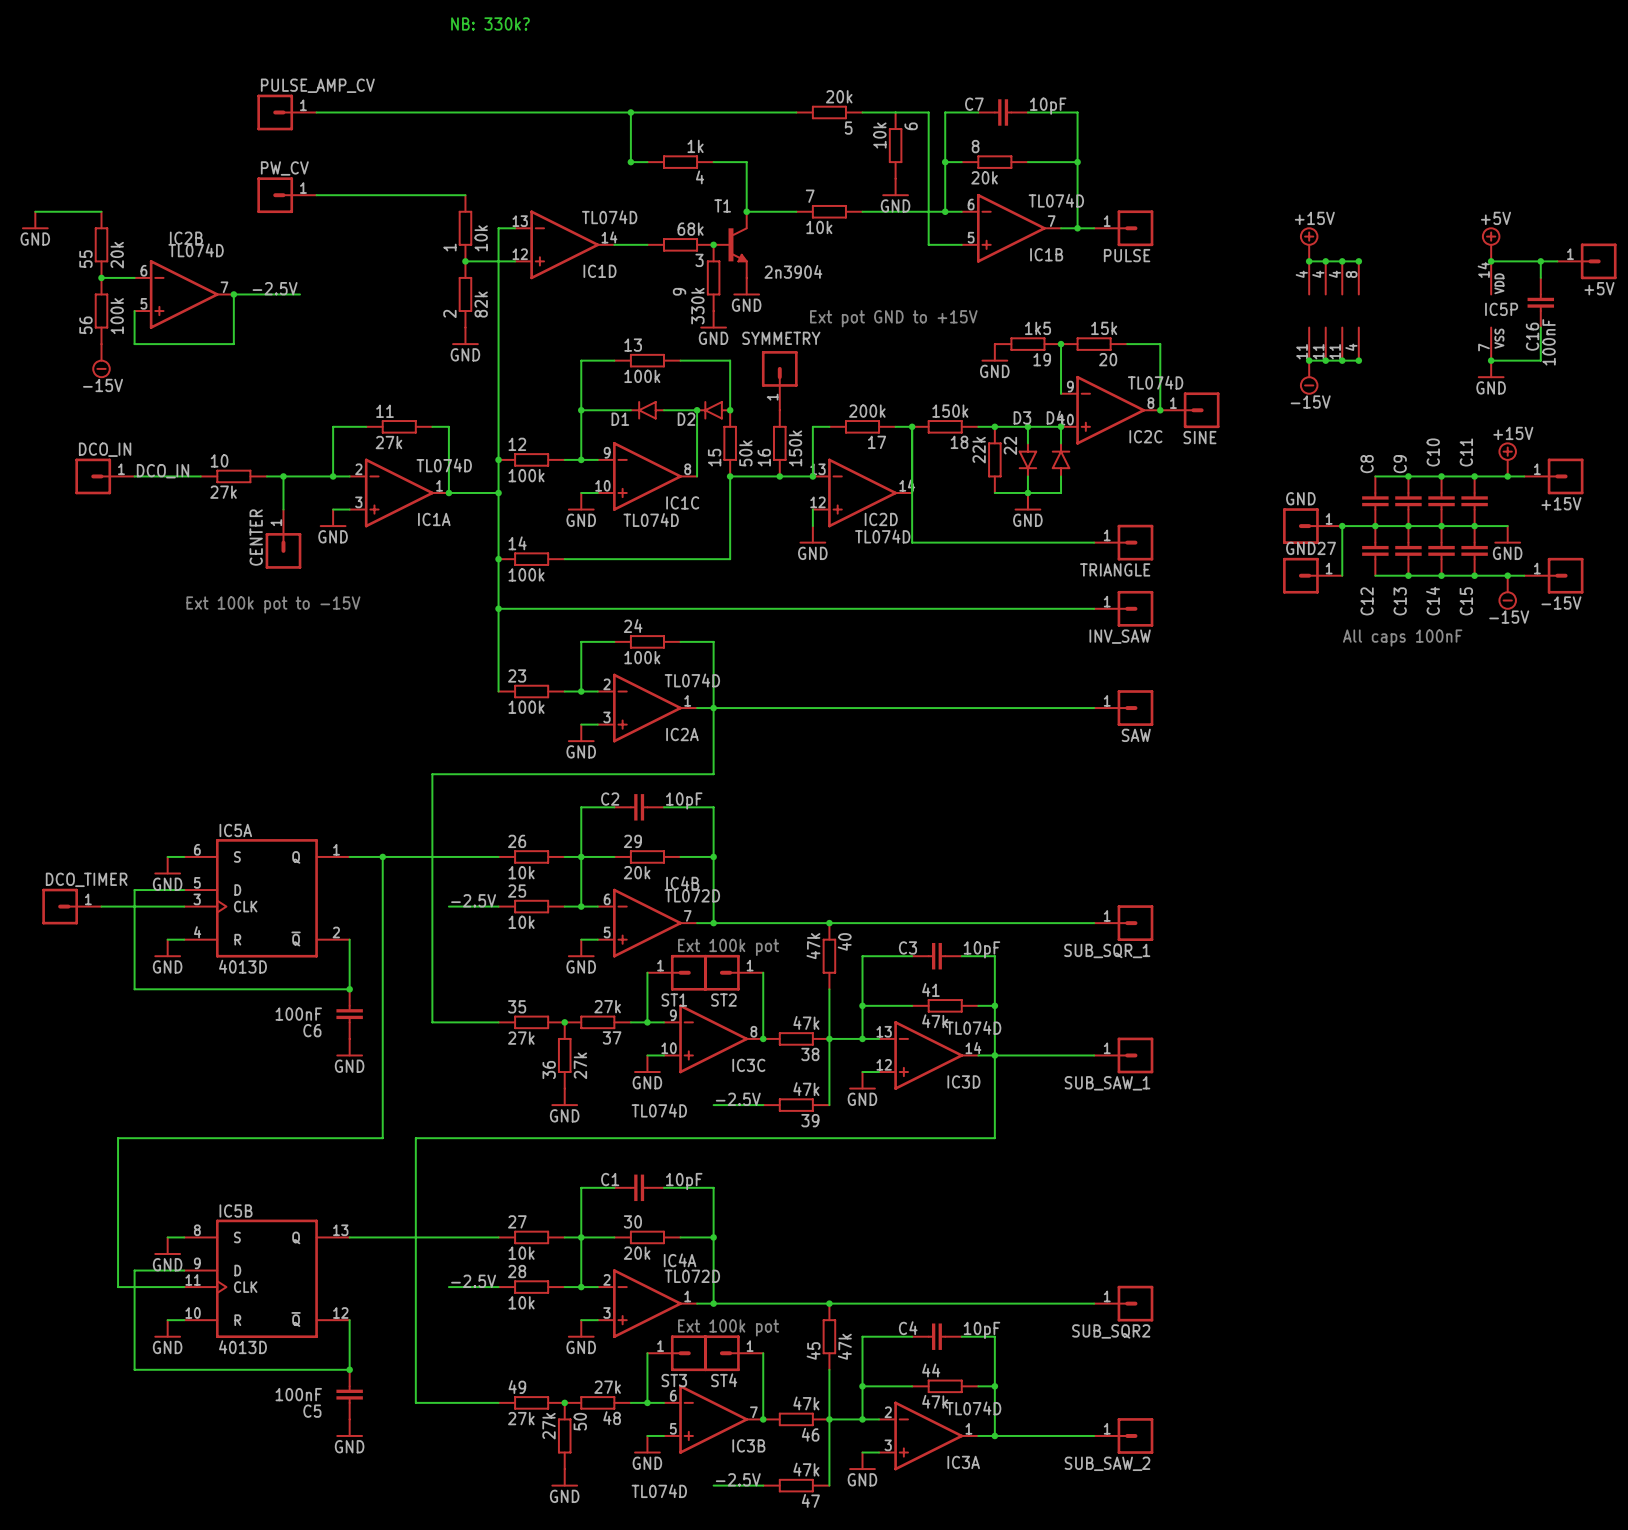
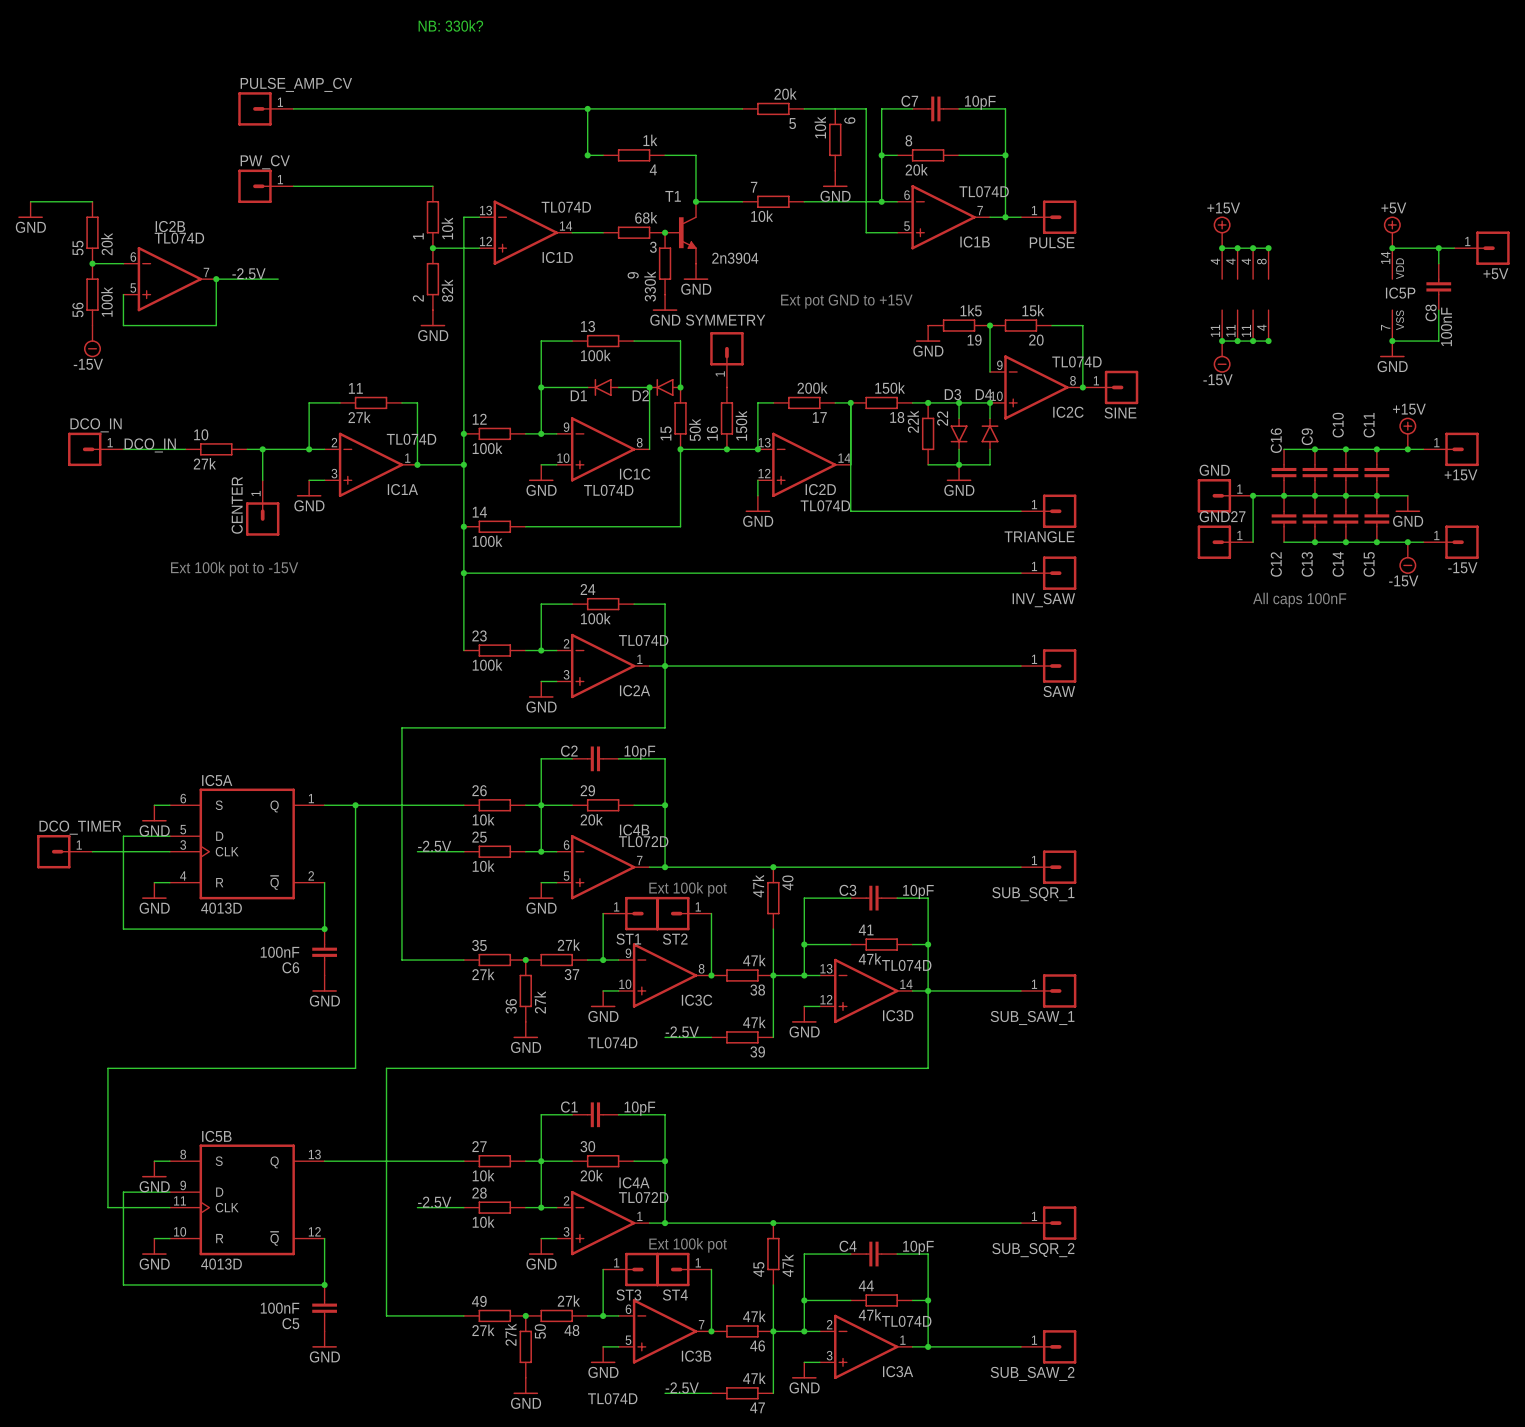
C16 name: C16 (1532, 336) -> C8 (1431, 312)
C8 name: C8 (1367, 464) -> C16 (1276, 440)
SUB_SQR2 name: SUB_SQR2 (1111, 1331) -> SUB_SQR_2 (1033, 1250)

